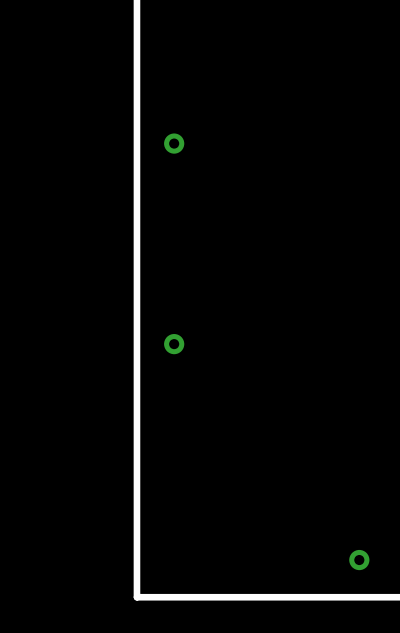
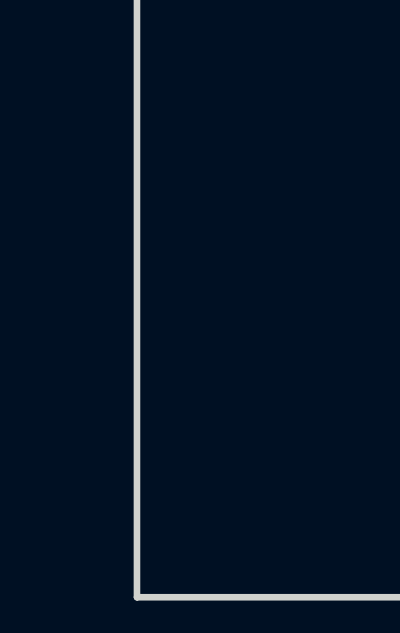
via: (174, 143) -> none
via: (174, 344) -> none
via: (359, 560) -> none

